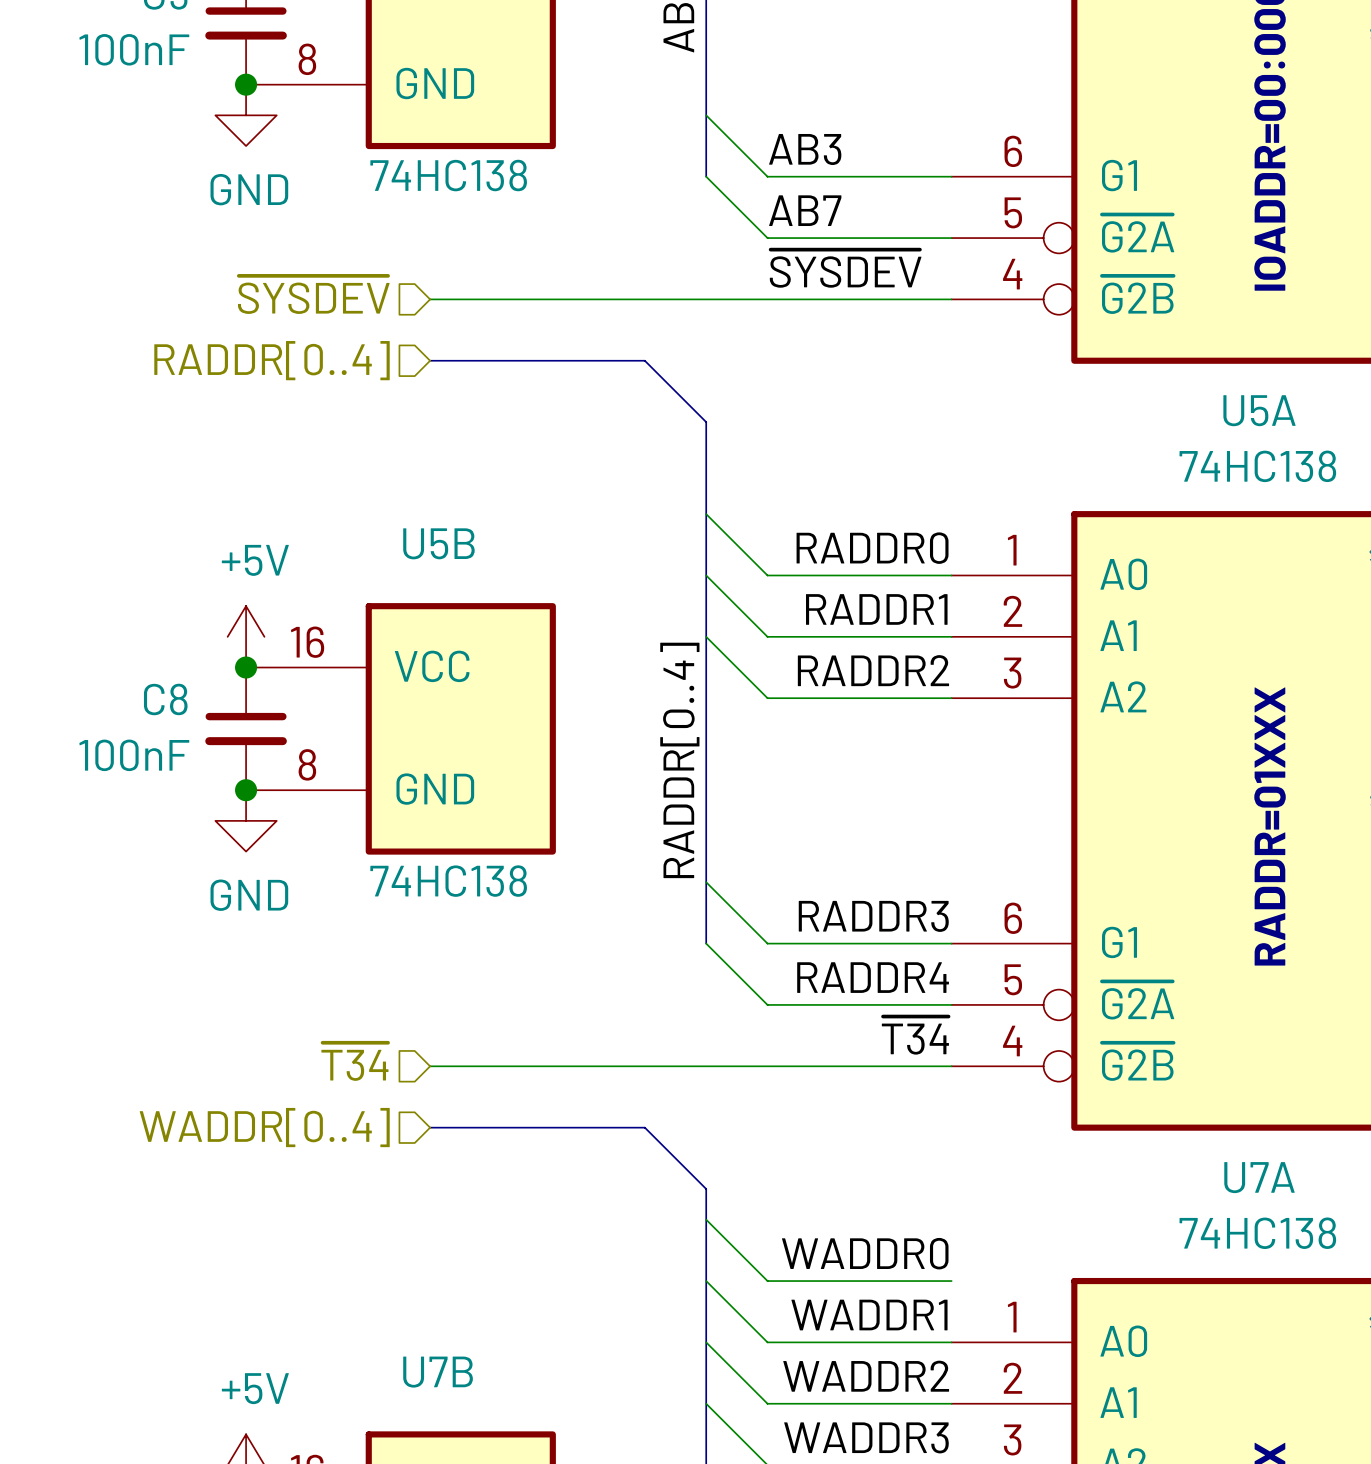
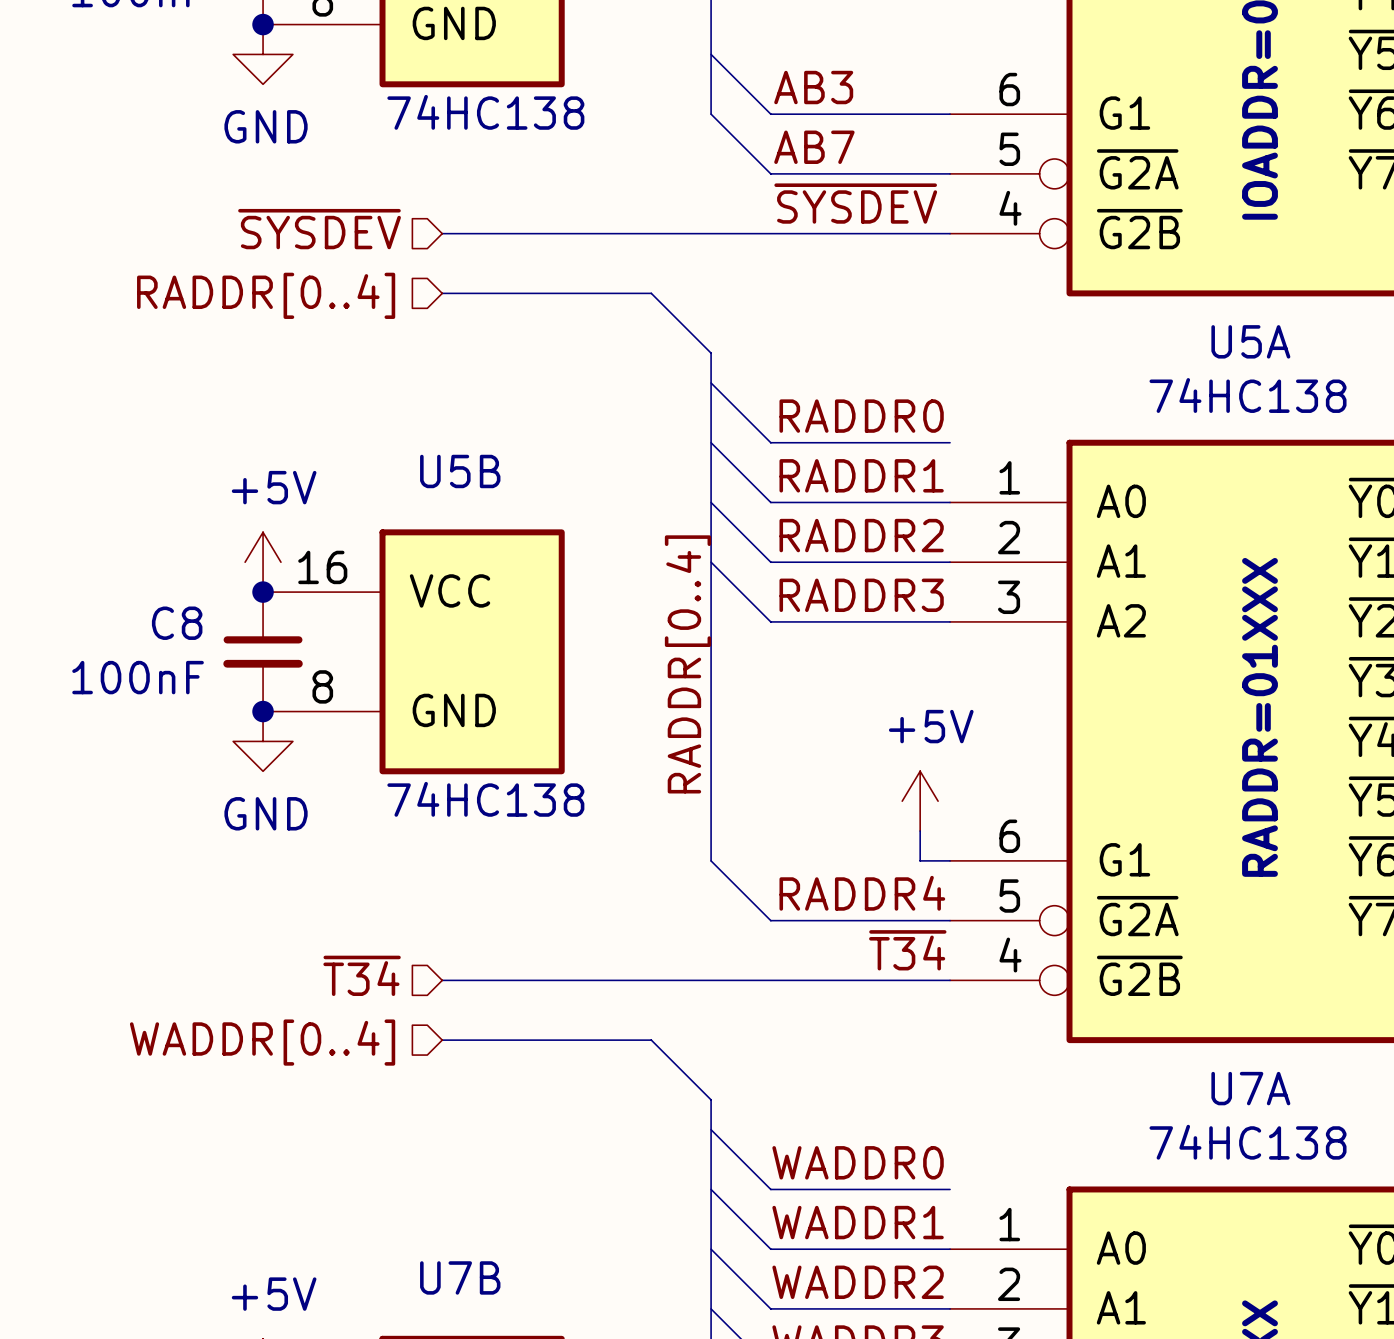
wire: none -> (711, 383) (770, 442) (950, 442)
label: none -> RADDR0 (861, 416)
label: RADDR0 (872, 548) -> RADDR1 (861, 475)
label: RADDR1 (876, 609) -> RADDR2 (861, 535)
label: RADDR2 (873, 670) -> RADDR3 (861, 595)
wire: (706, 882) (767, 943) (920, 943) -> (920, 831) (920, 860)
power symbol: none -> +5V (920, 801)
label: RADDR3 (873, 916) -> none

